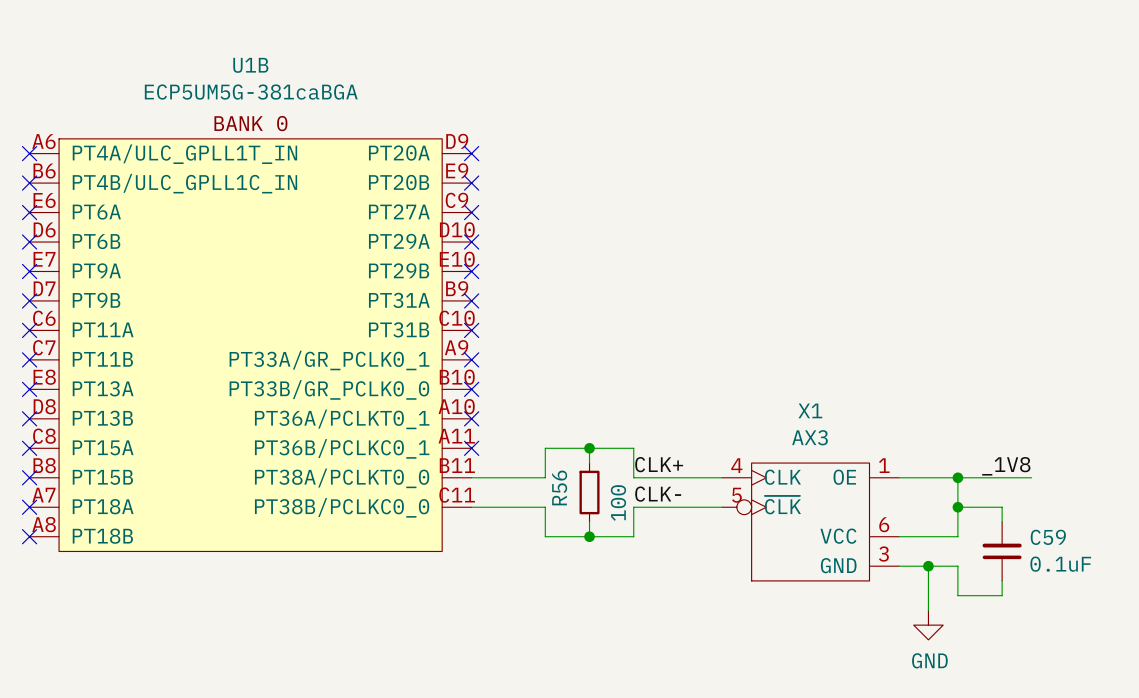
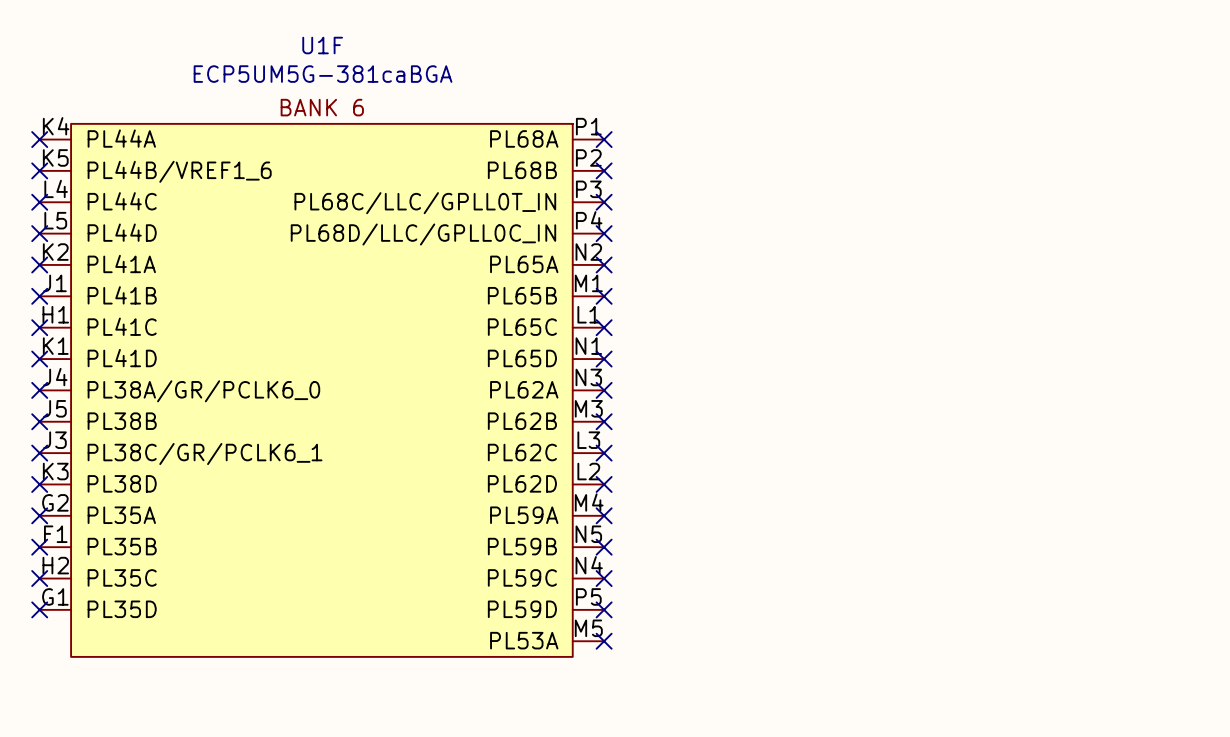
no-connect mark: (471, 153) -> none
no-connect mark: none -> (604, 139)
no-connect mark: (471, 183) -> none
no-connect mark: none -> (604, 170)
no-connect mark: (471, 212) -> none
no-connect mark: none -> (604, 202)
no-connect mark: (471, 242) -> none
no-connect mark: none -> (604, 233)
no-connect mark: (471, 271) -> none
no-connect mark: none -> (604, 264)
no-connect mark: (471, 300) -> none
no-connect mark: none -> (604, 296)
no-connect mark: (471, 330) -> none
no-connect mark: none -> (604, 327)
U1B: ECP5UM5G-381caBGA (250, 345) -> none
no-connect mark: (471, 359) -> none
no-connect mark: none -> (604, 359)
U1F: none -> ECP5UM5G-381caBGA (321, 390)
no-connect mark: (471, 389) -> none
no-connect mark: none -> (604, 390)
no-connect mark: (471, 418) -> none
no-connect mark: none -> (604, 421)
no-connect mark: (471, 448) -> none
no-connect mark: none -> (604, 453)
wire: (589, 448) (589, 463) -> none
junction: (589, 448) -> none
label: CLK+ (659, 464) -> none
label: _1V8 (1006, 466) -> none
wire: (471, 477) (545, 477) (545, 448) (633, 448) (633, 477) (722, 477) -> none
no-connect mark: none -> (604, 484)
wire: (898, 477) (1031, 477) -> none
wire: (957, 477) (957, 536) (898, 536) -> none
junction: (957, 477) -> none
R56: 100 (589, 492) -> none
label: CLK- (658, 494) -> none
wire: (471, 507) (545, 507) (545, 536) (633, 536) (633, 507) (722, 507) -> none
no-connect mark: none -> (604, 515)
wire: (957, 507) (1002, 507) (1002, 521) -> none
junction: (957, 507) -> none
wire: (589, 521) (589, 536) -> none
X1: AX3 (810, 521) -> none
no-connect mark: none -> (604, 547)
junction: (589, 536) -> none
C59: 0.1uF (1002, 551) -> none
no-connect mark: none -> (39, 578)
no-connect mark: none -> (604, 578)
wire: (898, 566) (957, 566) (957, 595) (1002, 595) (1002, 580) -> none
wire: (928, 566) (928, 610) -> none
junction: (928, 566) -> none
no-connect mark: none -> (39, 609)
no-connect mark: none -> (604, 609)
no-connect mark: none -> (604, 641)
power symbol: GND (928, 625) -> none

